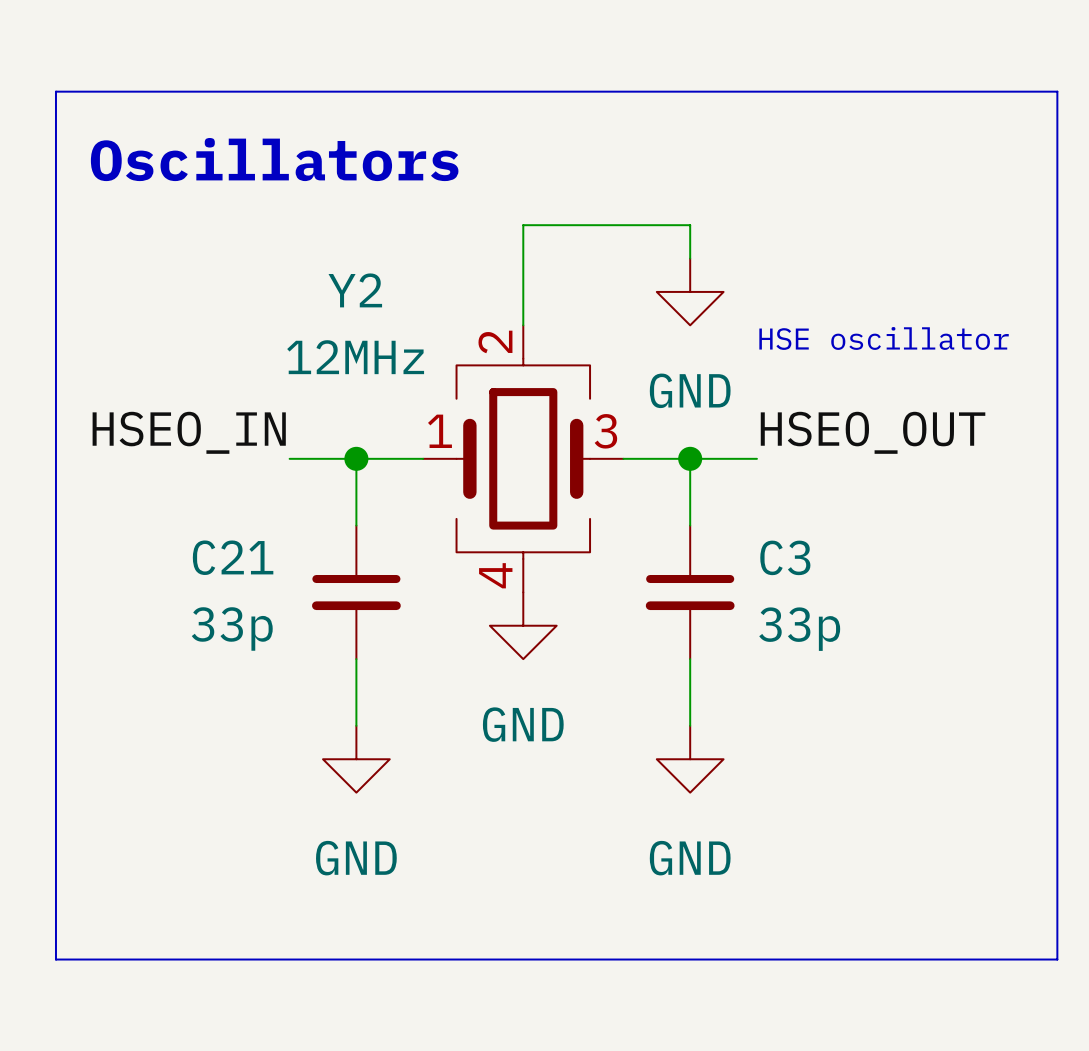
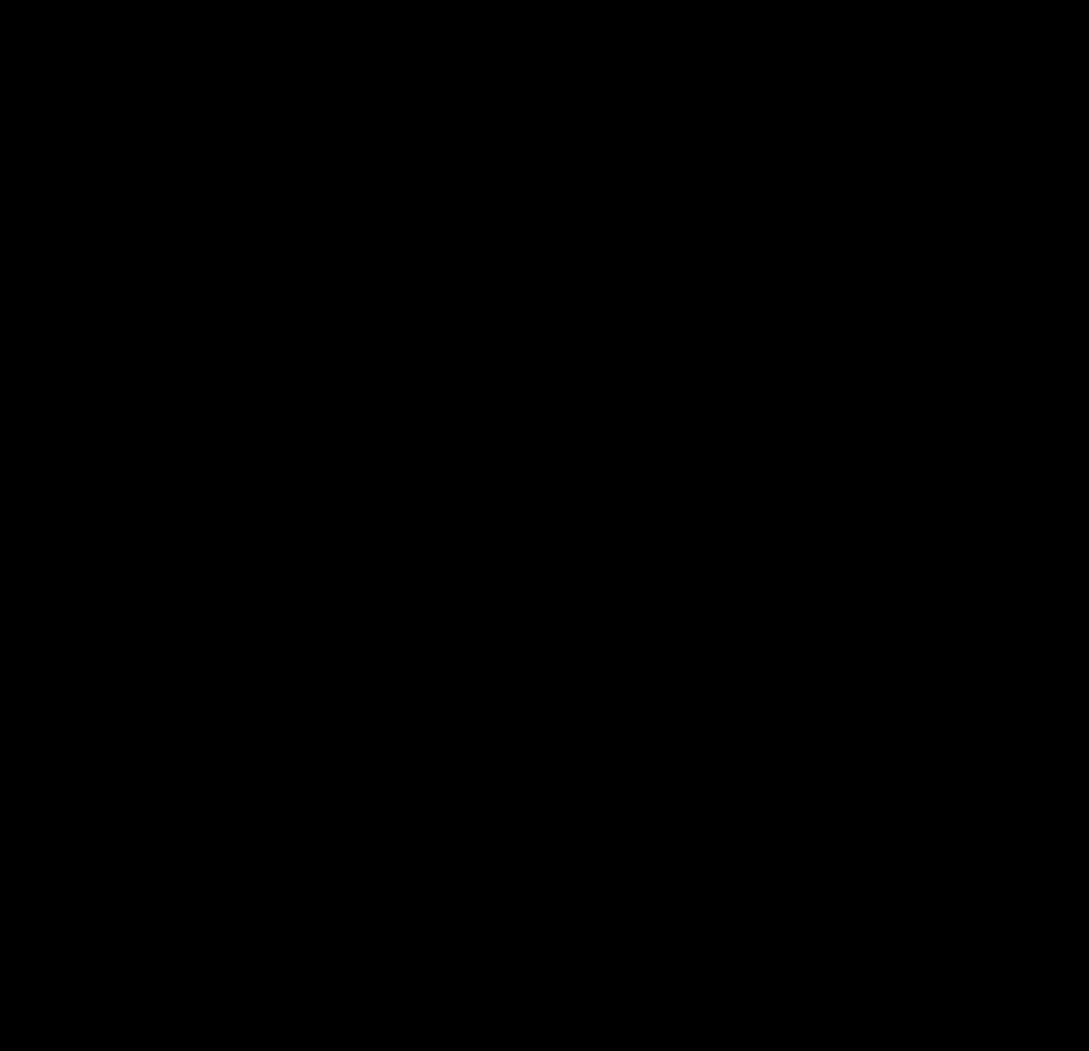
line: (55, 91) (1057, 91) (1057, 959) (55, 959) (55, 91) -> none
text: Oscillators (274, 159) -> none
wire: (690, 258) (690, 225) (523, 225) (523, 325) -> none
power symbol: GND (690, 291) -> none
text: HSE oscillator (884, 338) -> none
label: HSEO_IN (189, 432) -> none
label: HSEO_OUT (873, 432) -> none
wire: (289, 458) (423, 458) -> none
wire: (356, 458) (356, 525) -> none
junction: (356, 458) -> none
Y2: 12MHz (523, 458) -> none
wire: (623, 458) (756, 458) -> none
wire: (690, 458) (690, 525) -> none
junction: (690, 458) -> none
C21: 33p (356, 592) -> none
C3: 33p (690, 592) -> none
power symbol: GND (523, 625) -> none
wire: (356, 659) (356, 725) -> none
wire: (690, 659) (690, 725) -> none
power symbol: GND (356, 759) -> none
power symbol: GND (690, 759) -> none

